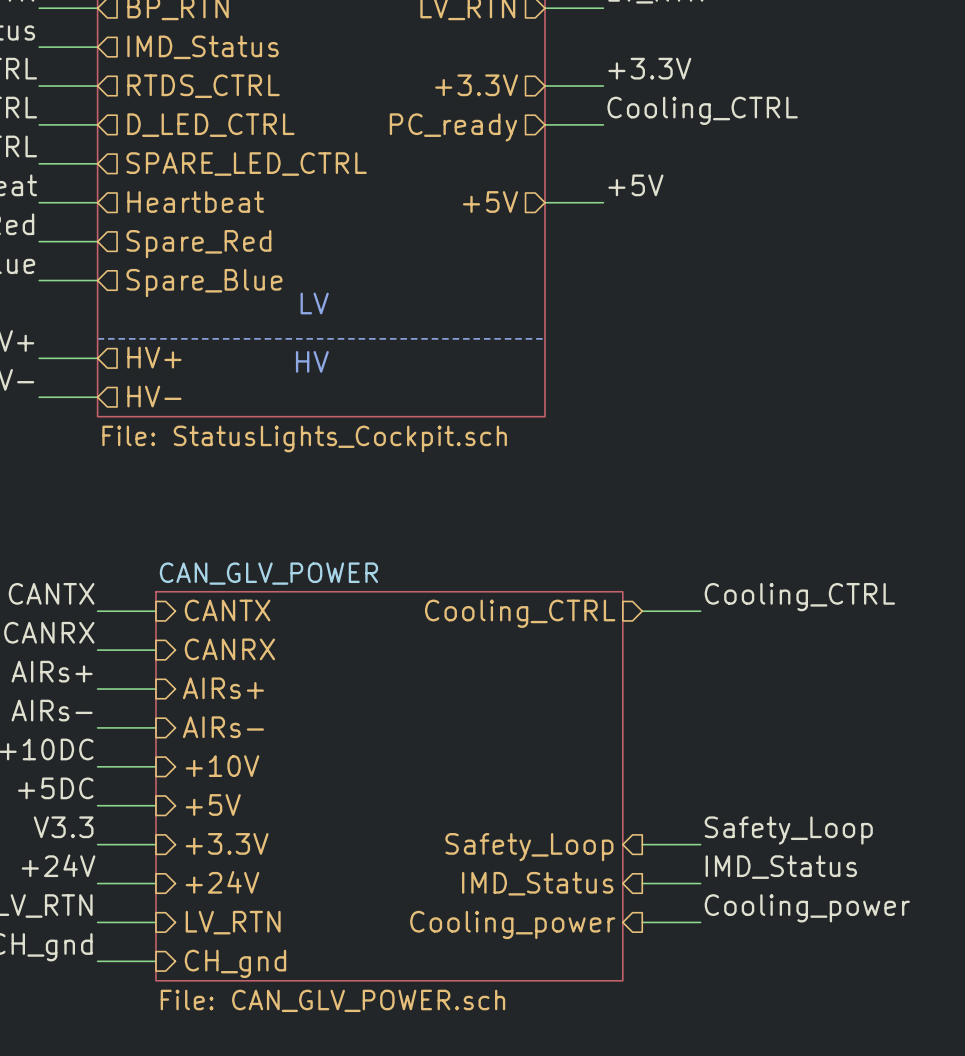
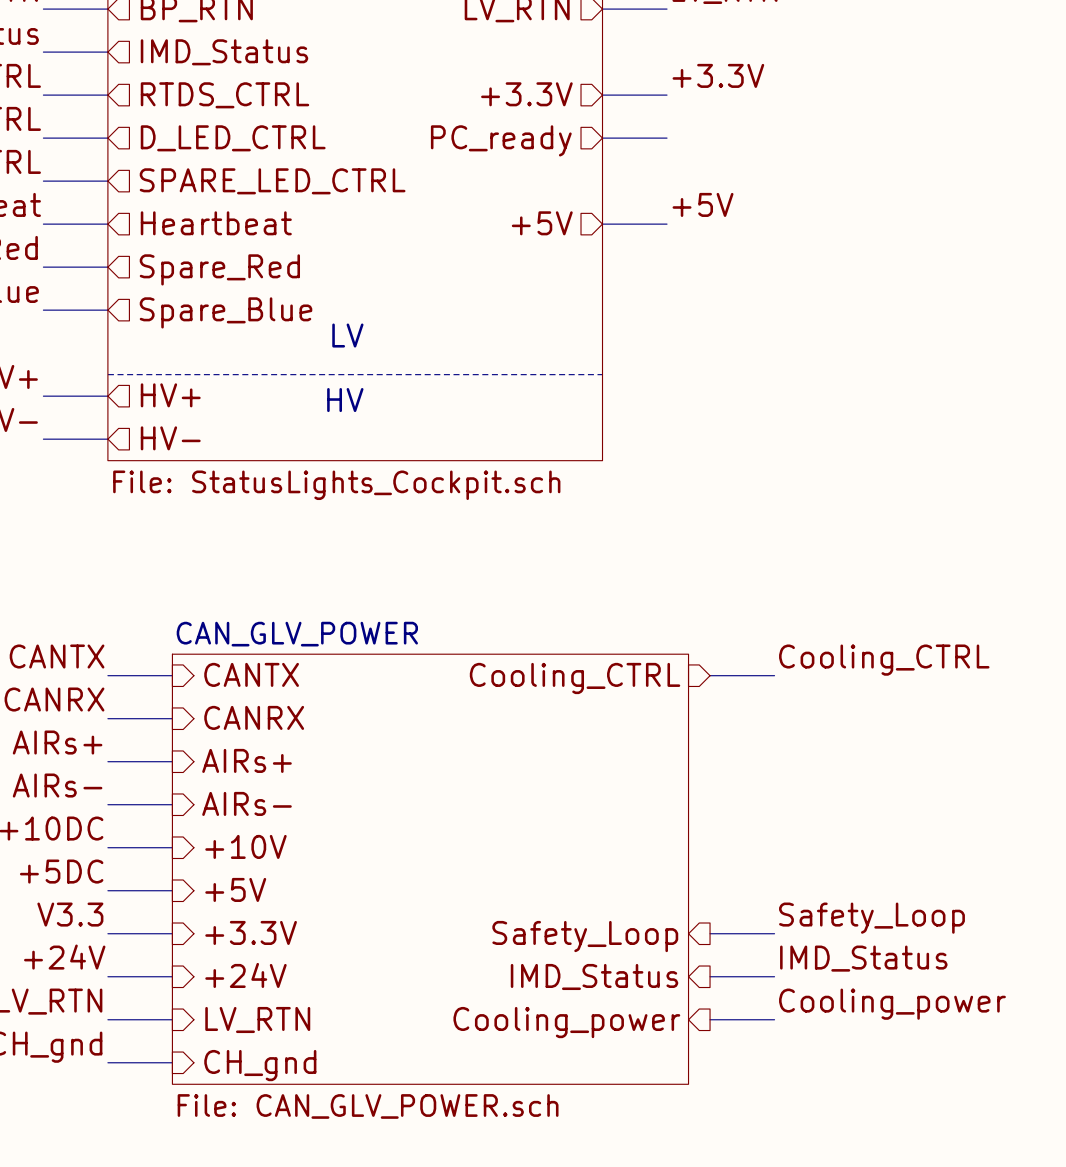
label: Cooling_CTRL (702, 110) -> none

